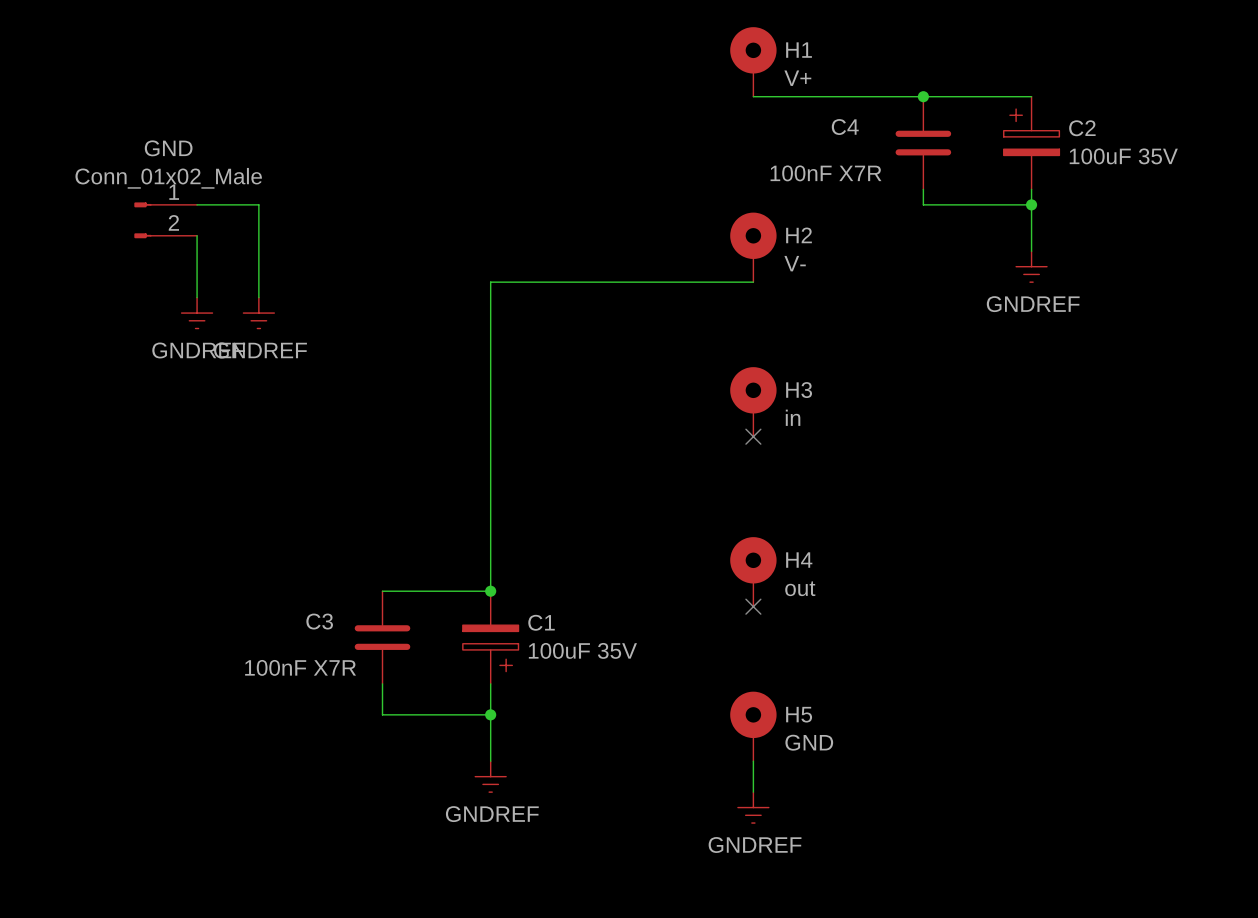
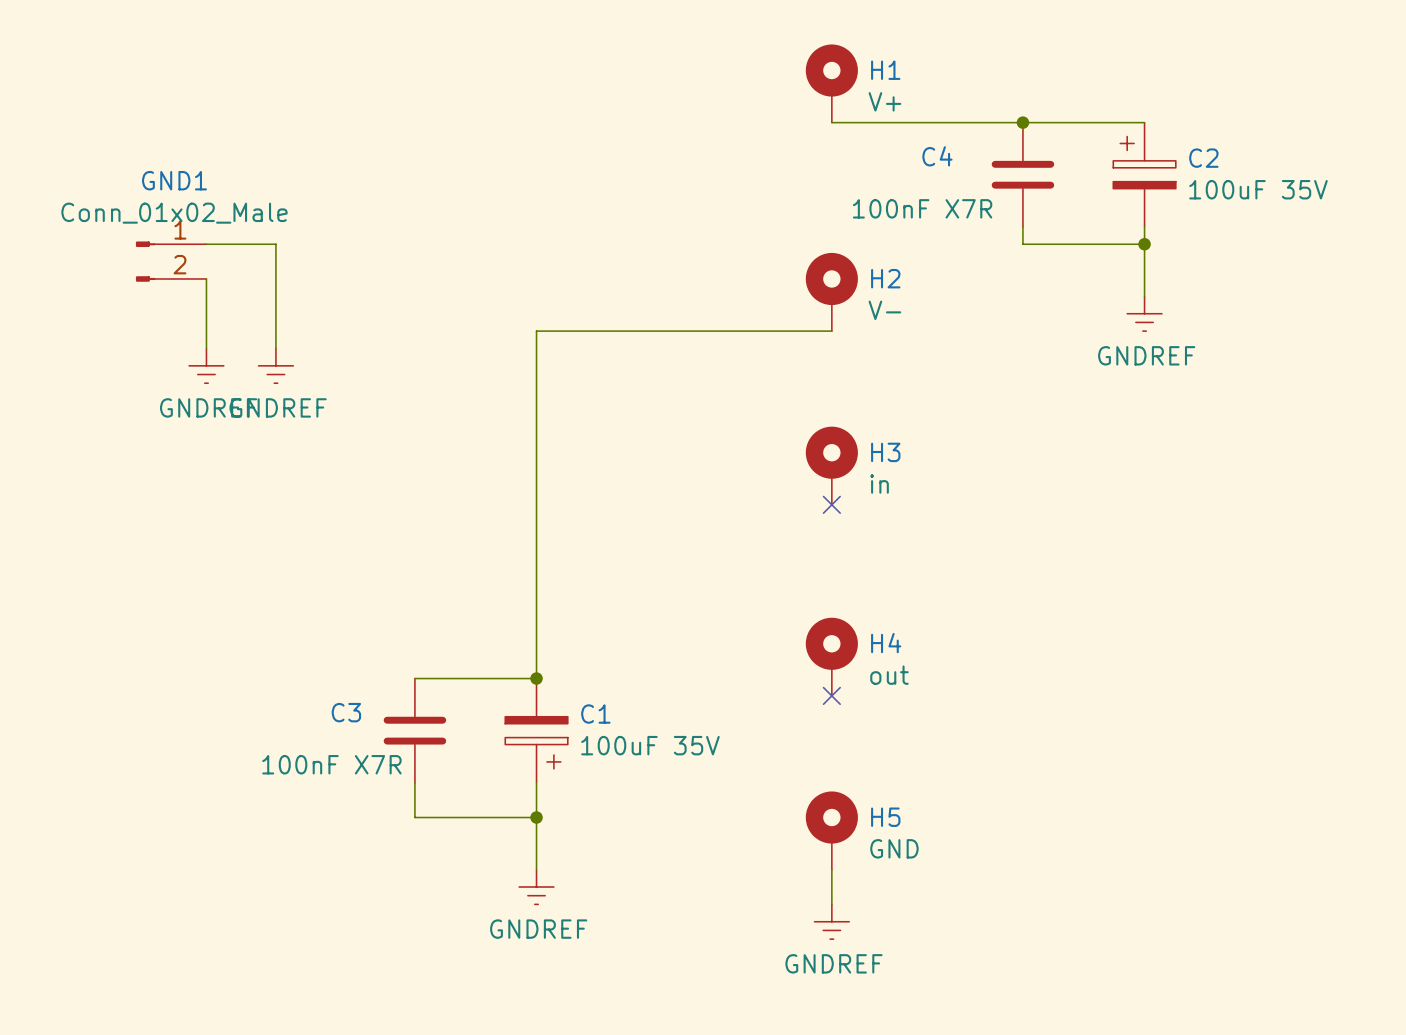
GND name: GND (168, 148) -> GND1 (174, 180)

